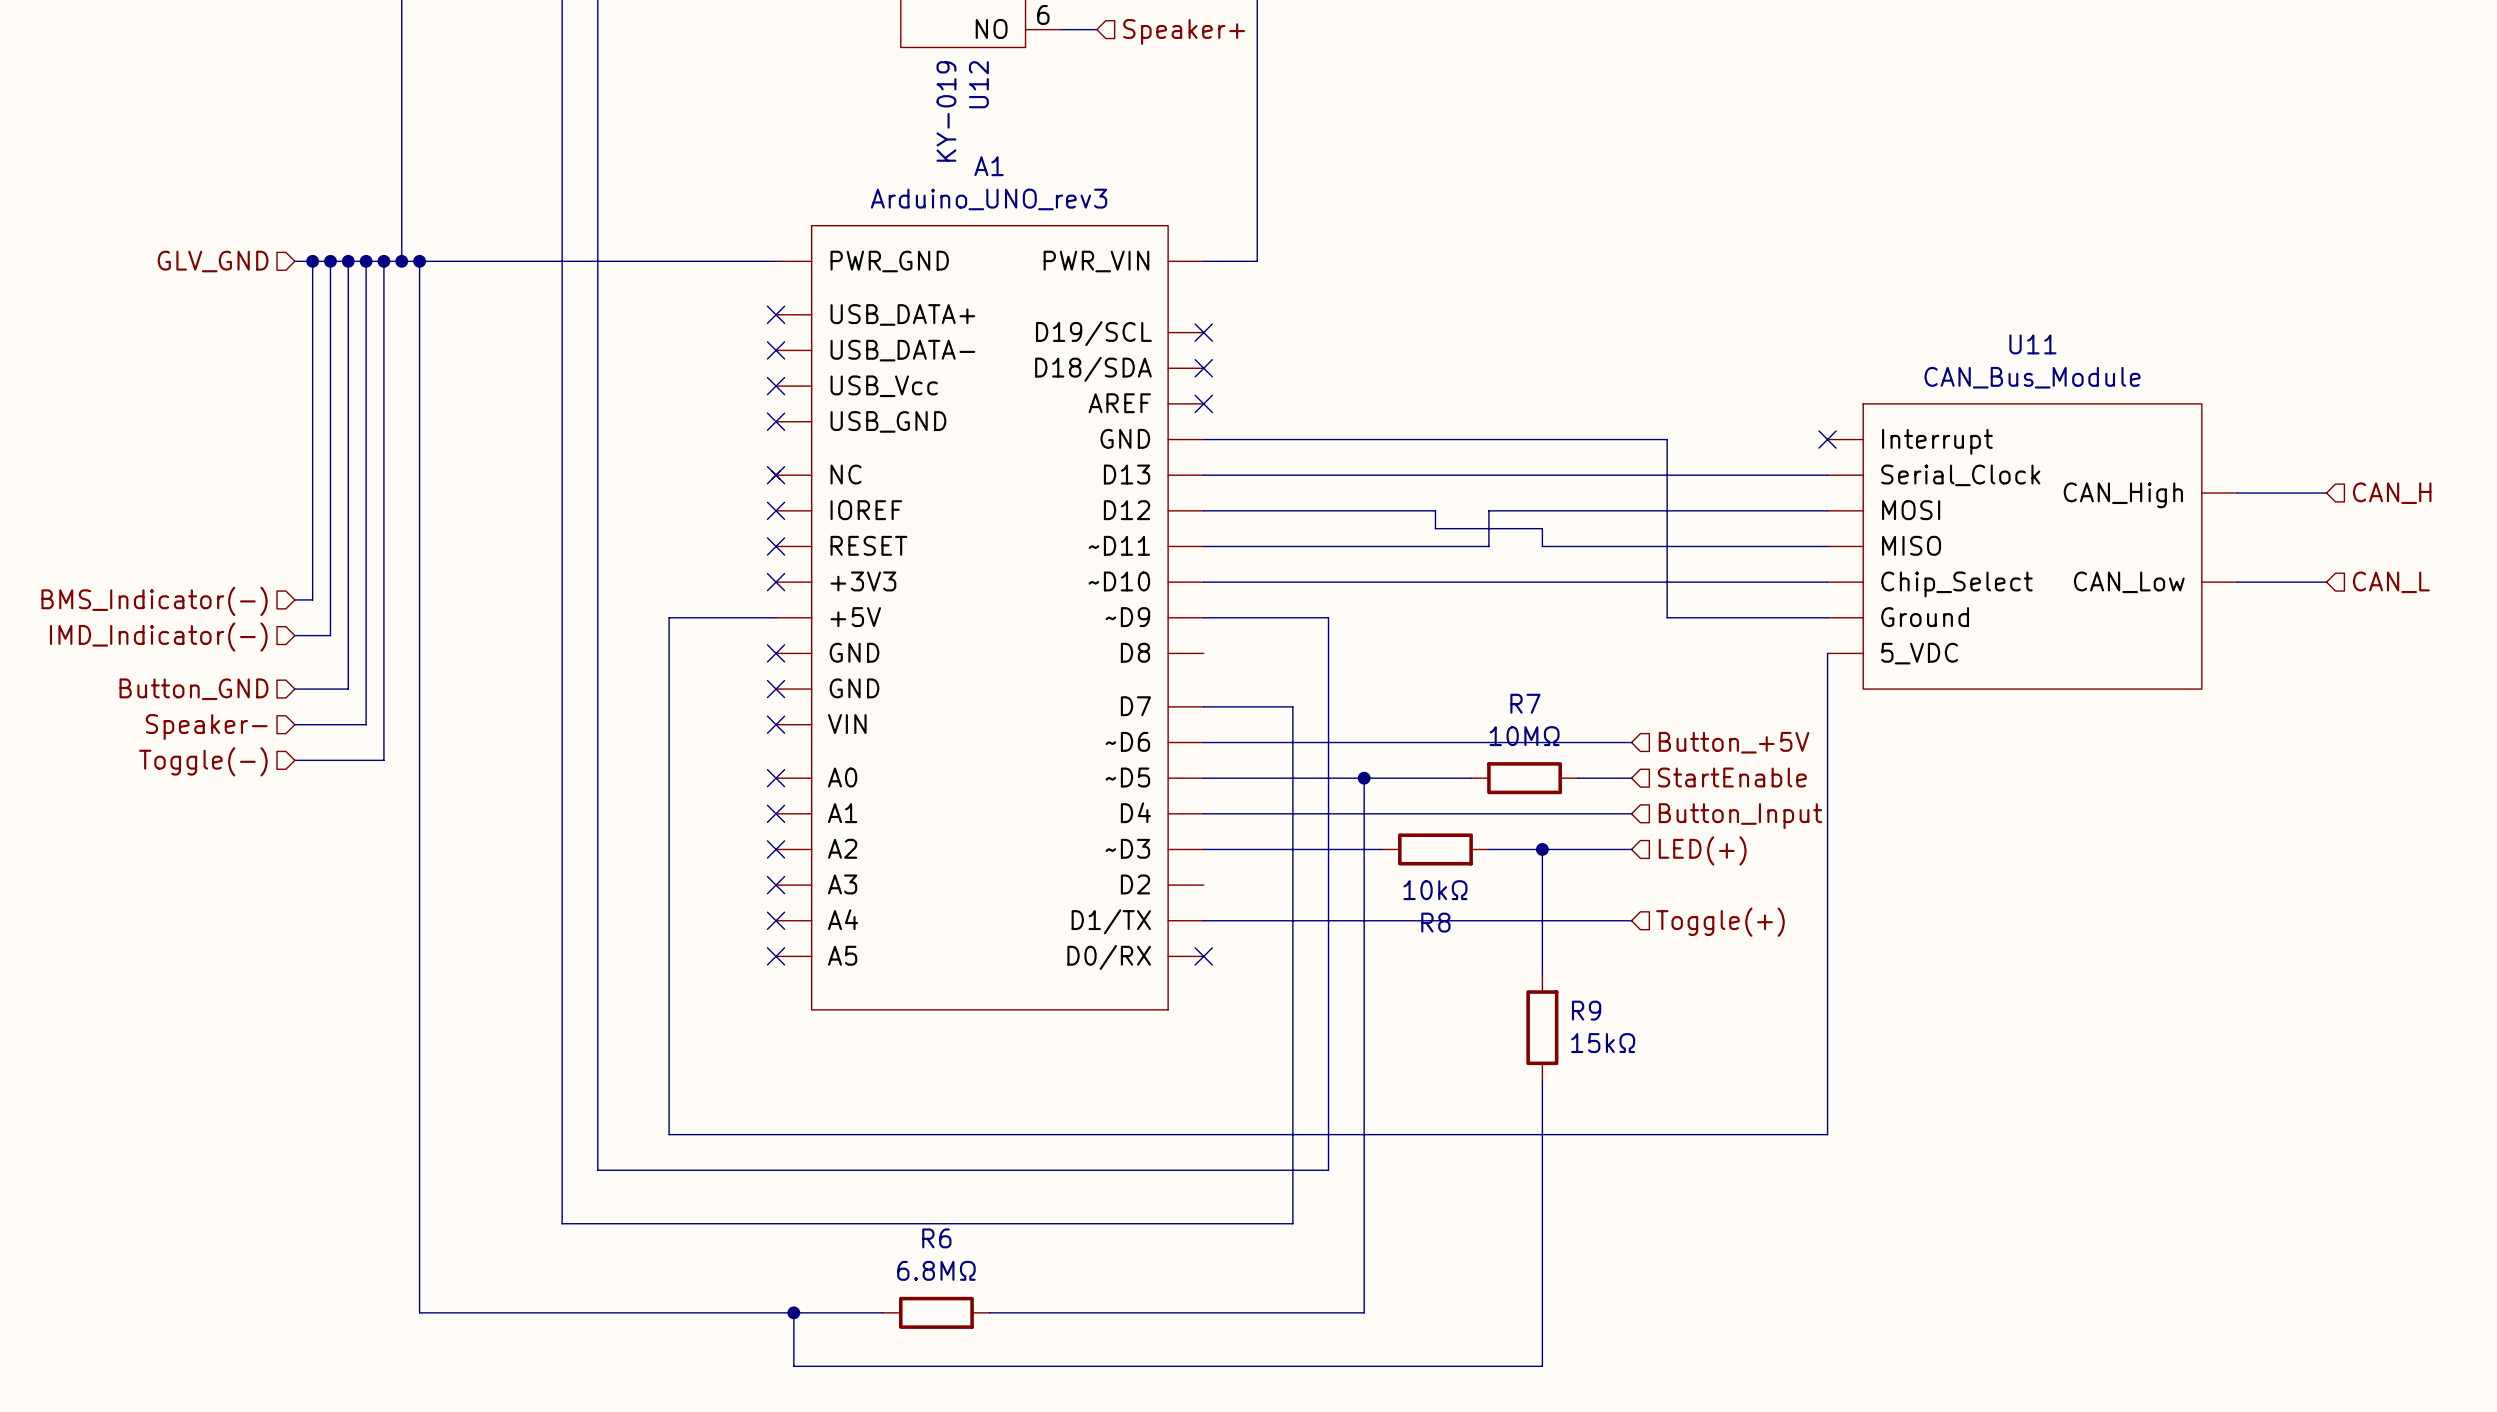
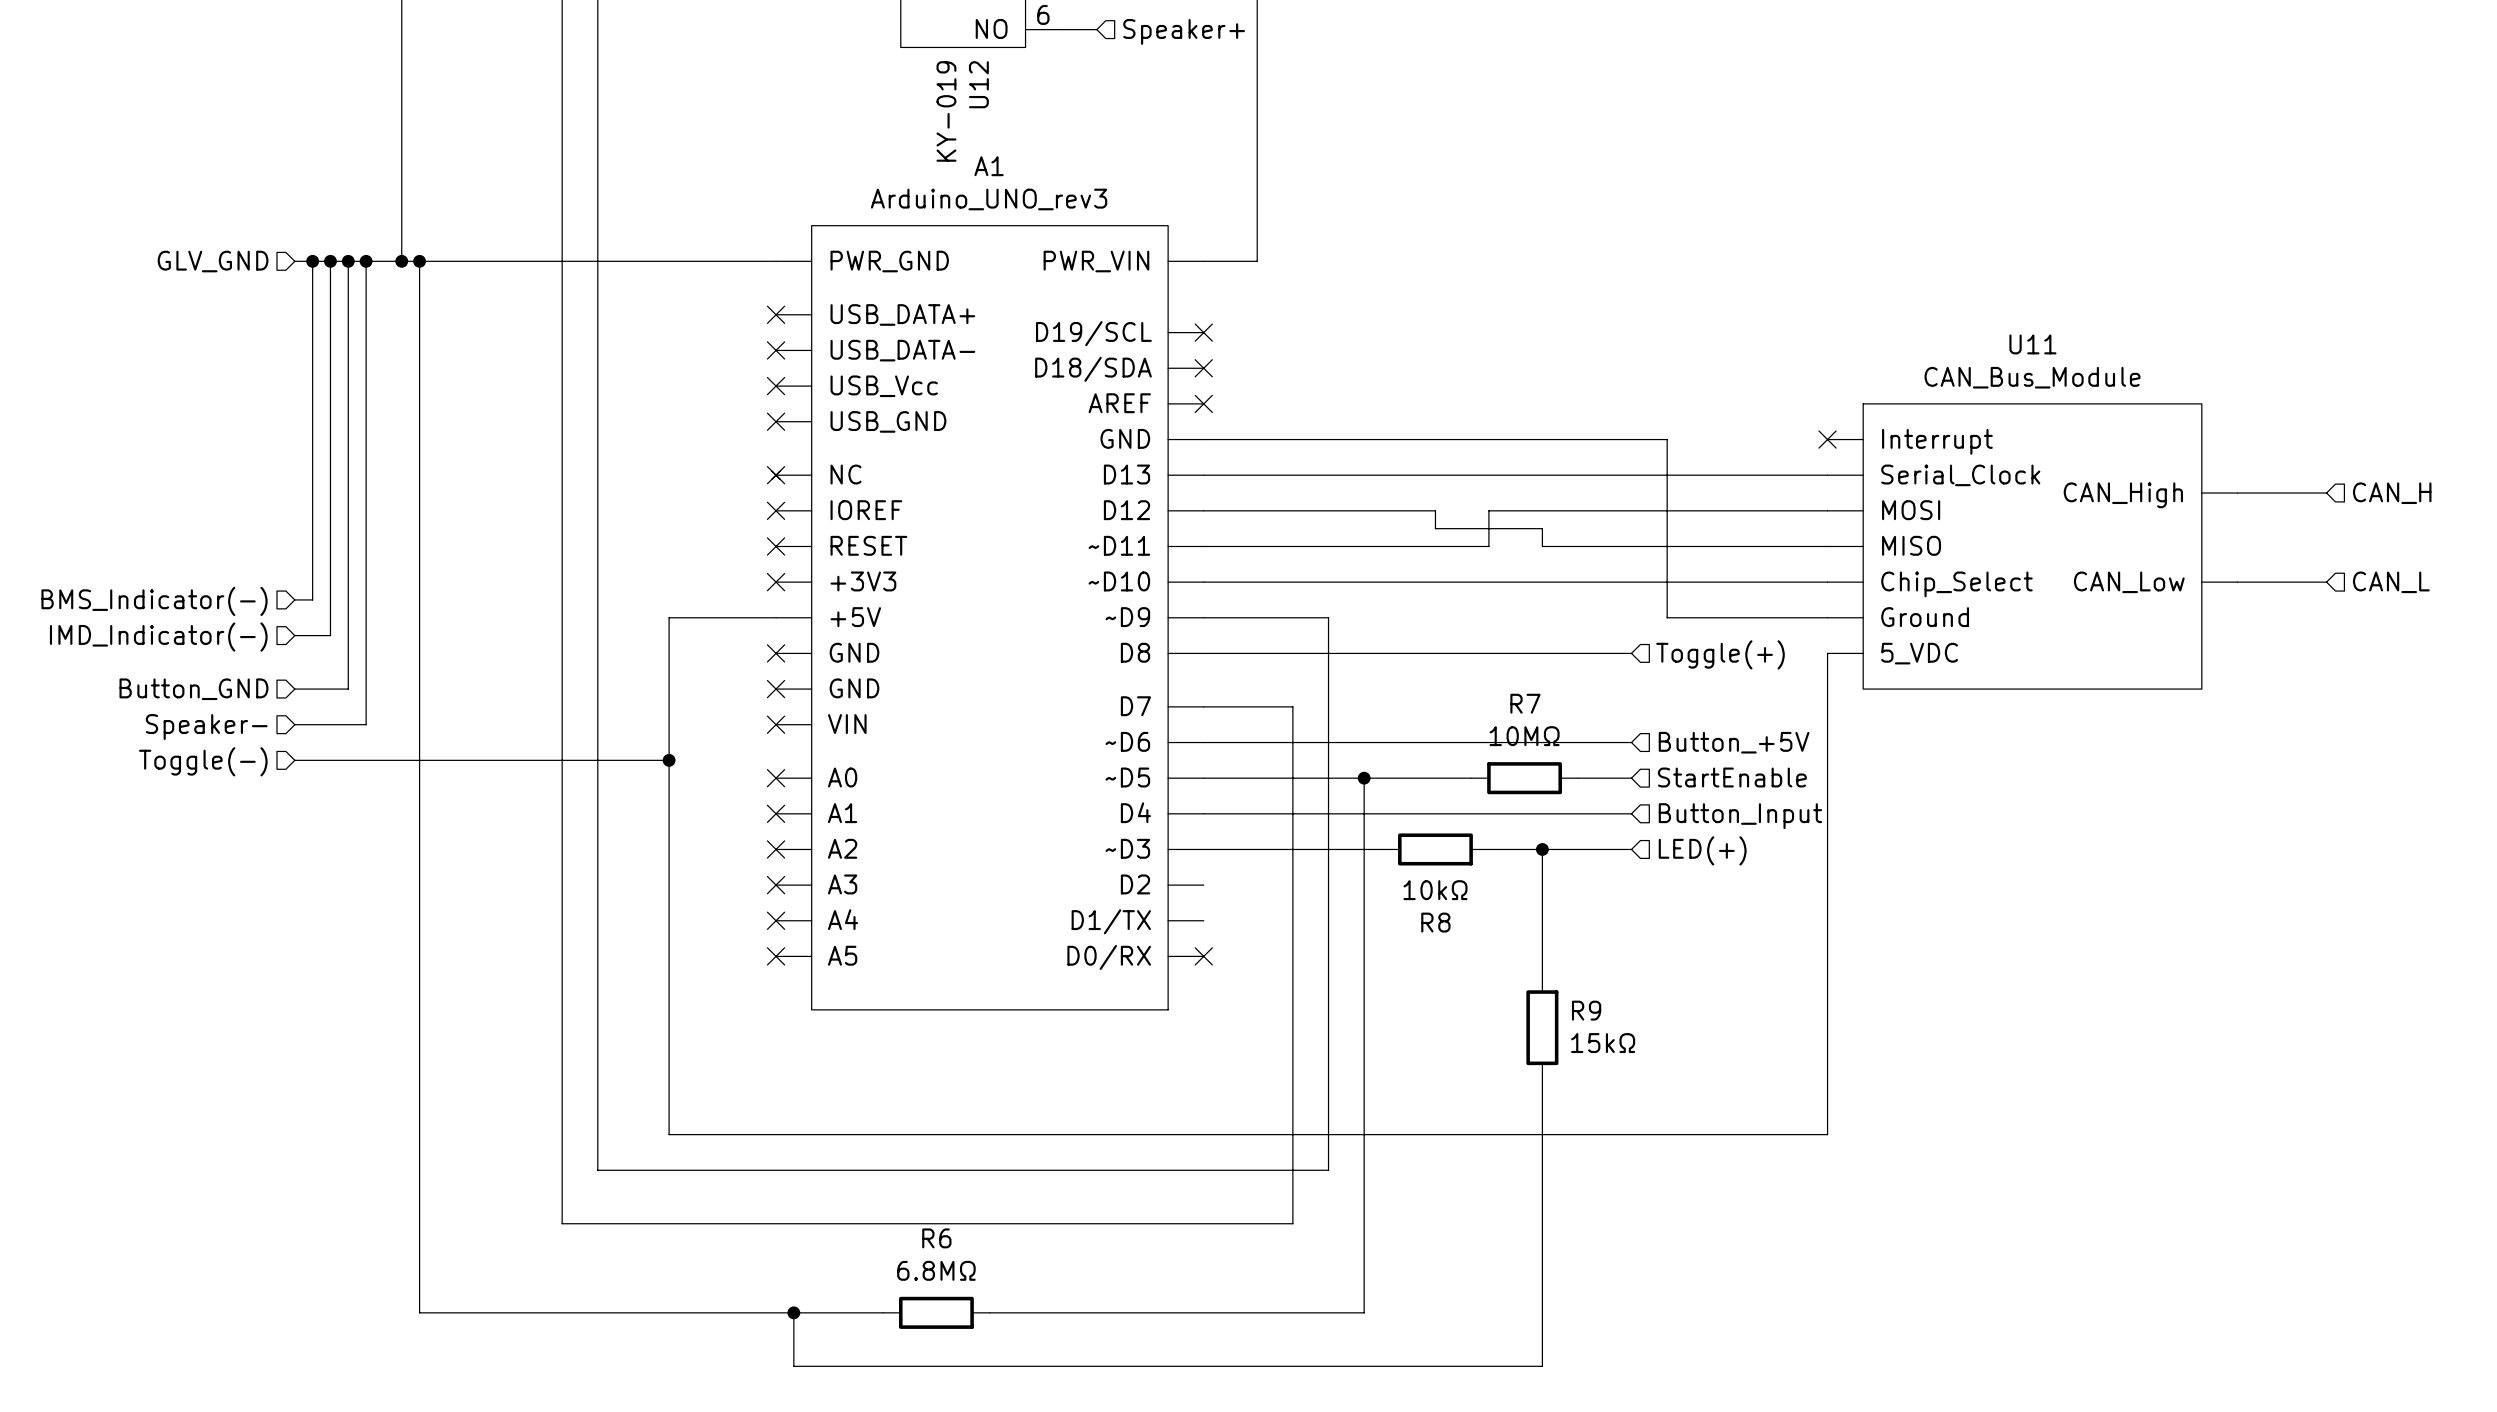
wire: (383, 261) (383, 760) -> (669, 760) (383, 760)
junction: (383, 261) -> none
junction: none -> (669, 760)
wire: (1203, 920) (1631, 920) -> (1203, 653) (1631, 653)
hierarchical label position: Toggle(+) (1720, 922) -> Toggle(+) (1720, 654)

